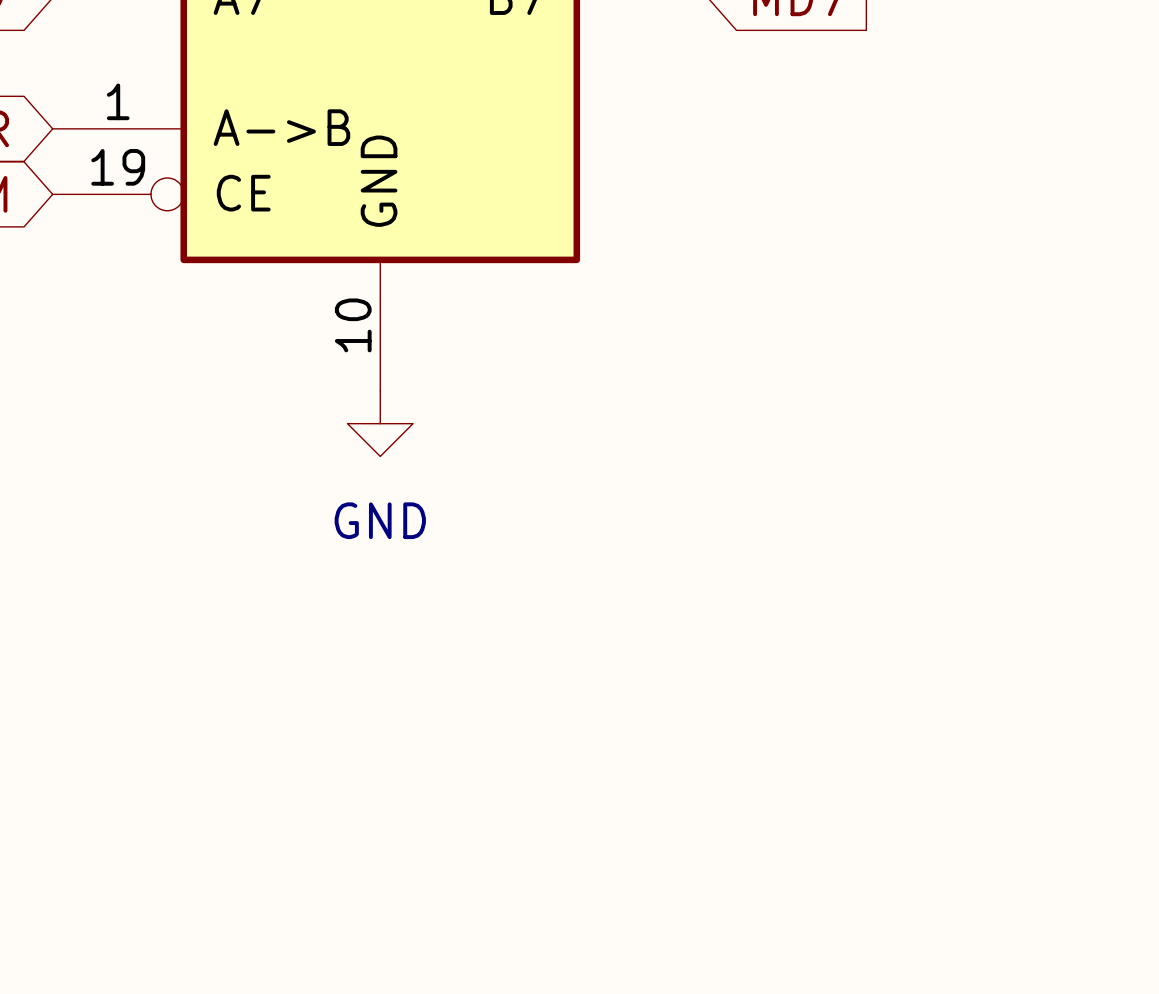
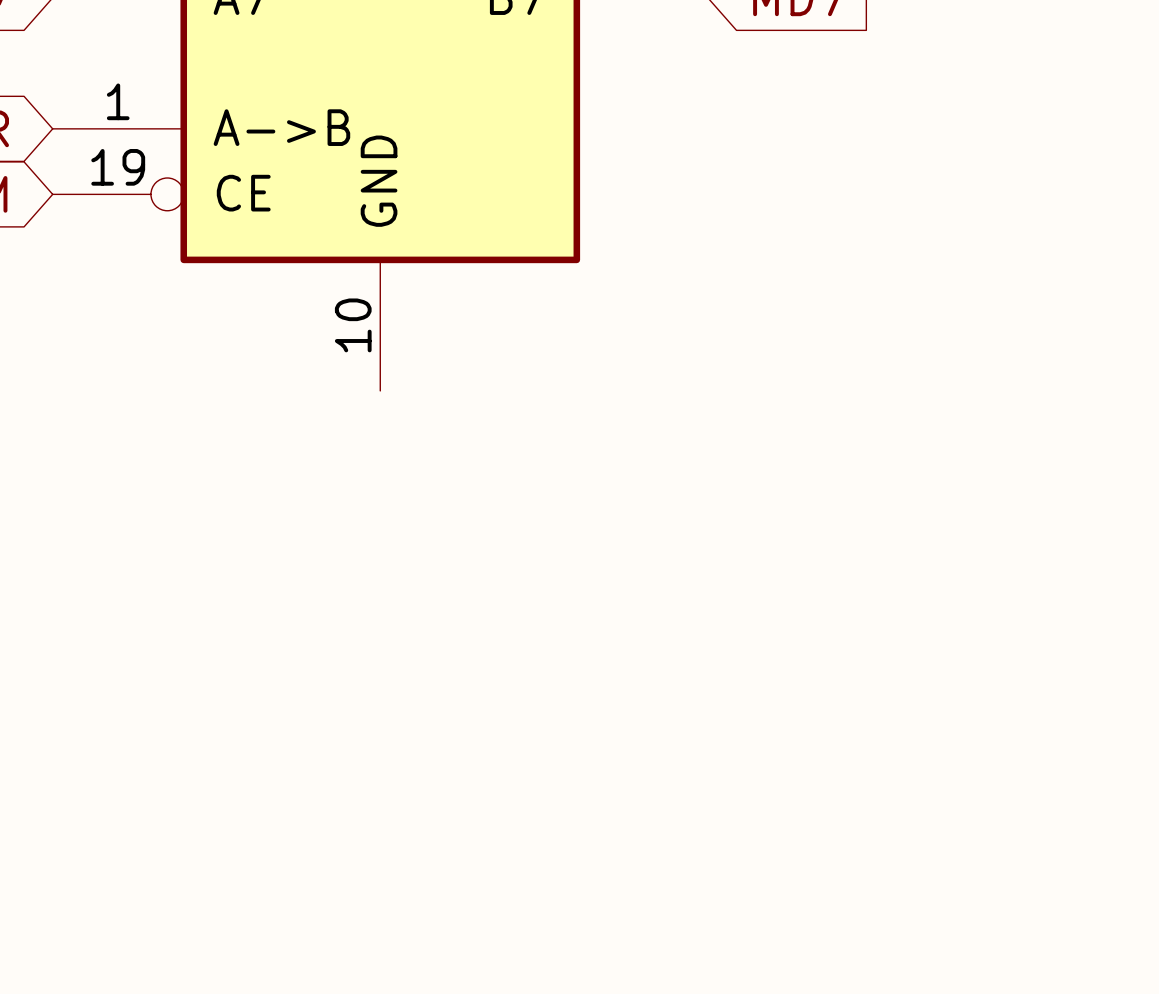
power symbol: GND (380, 423) -> none

